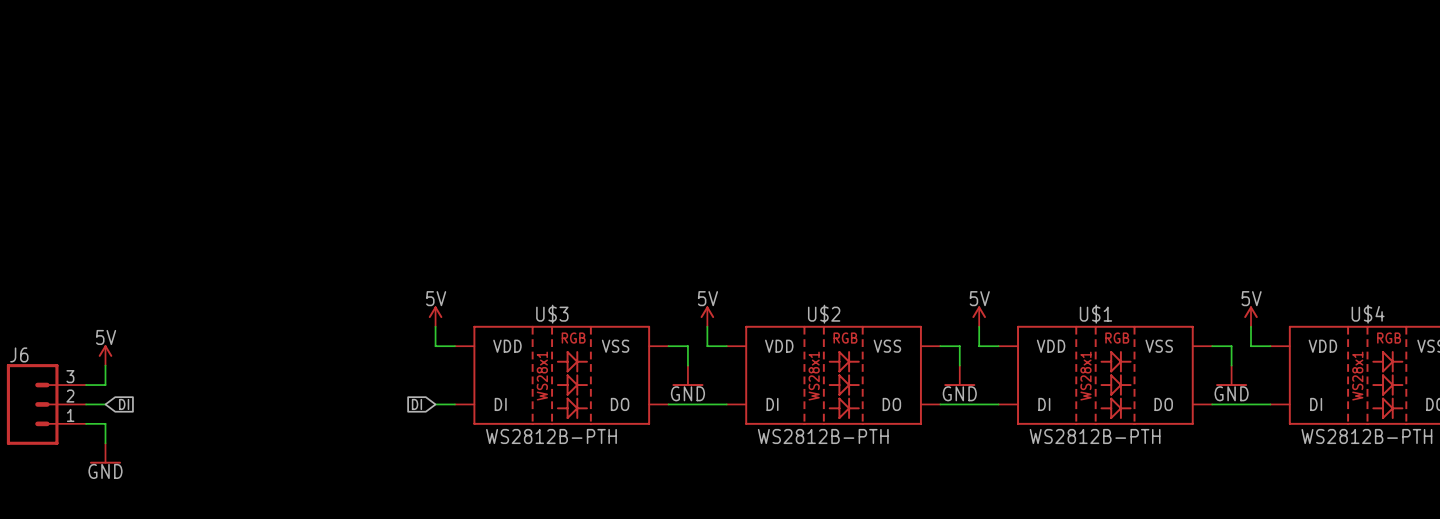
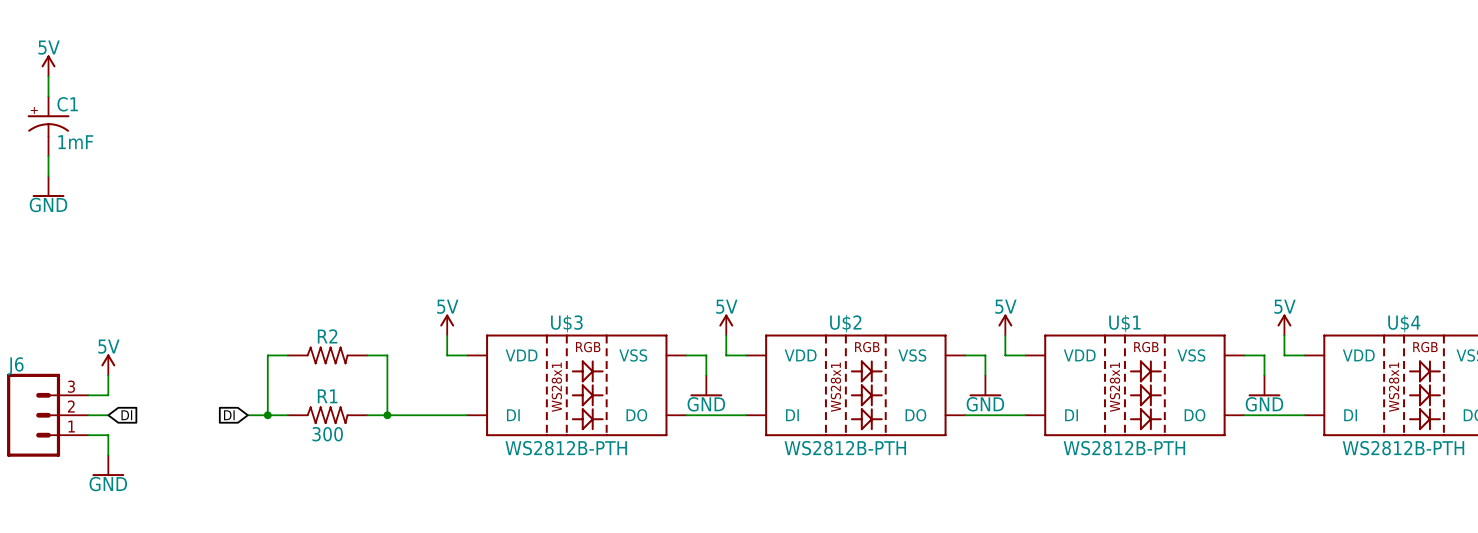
power symbol: none -> 5V (48, 65)
wire: none -> (48, 76) (48, 96)
C1: none -> 1mF (48, 126)
wire: none -> (48, 156) (48, 176)
power symbol: none -> GND (48, 186)
wire: none -> (287, 355) (267, 355) (267, 415)
R2: none -> (327, 355)
wire: none -> (367, 355) (387, 355) (387, 415)
global label: none -> DI (229, 415)
wire: none -> (247, 415) (287, 415)
junction: none -> (267, 415)
R1: none -> 300 (327, 415)
wire: none -> (367, 415) (447, 415)
junction: none -> (387, 415)
global label: DI (416, 404) -> none

